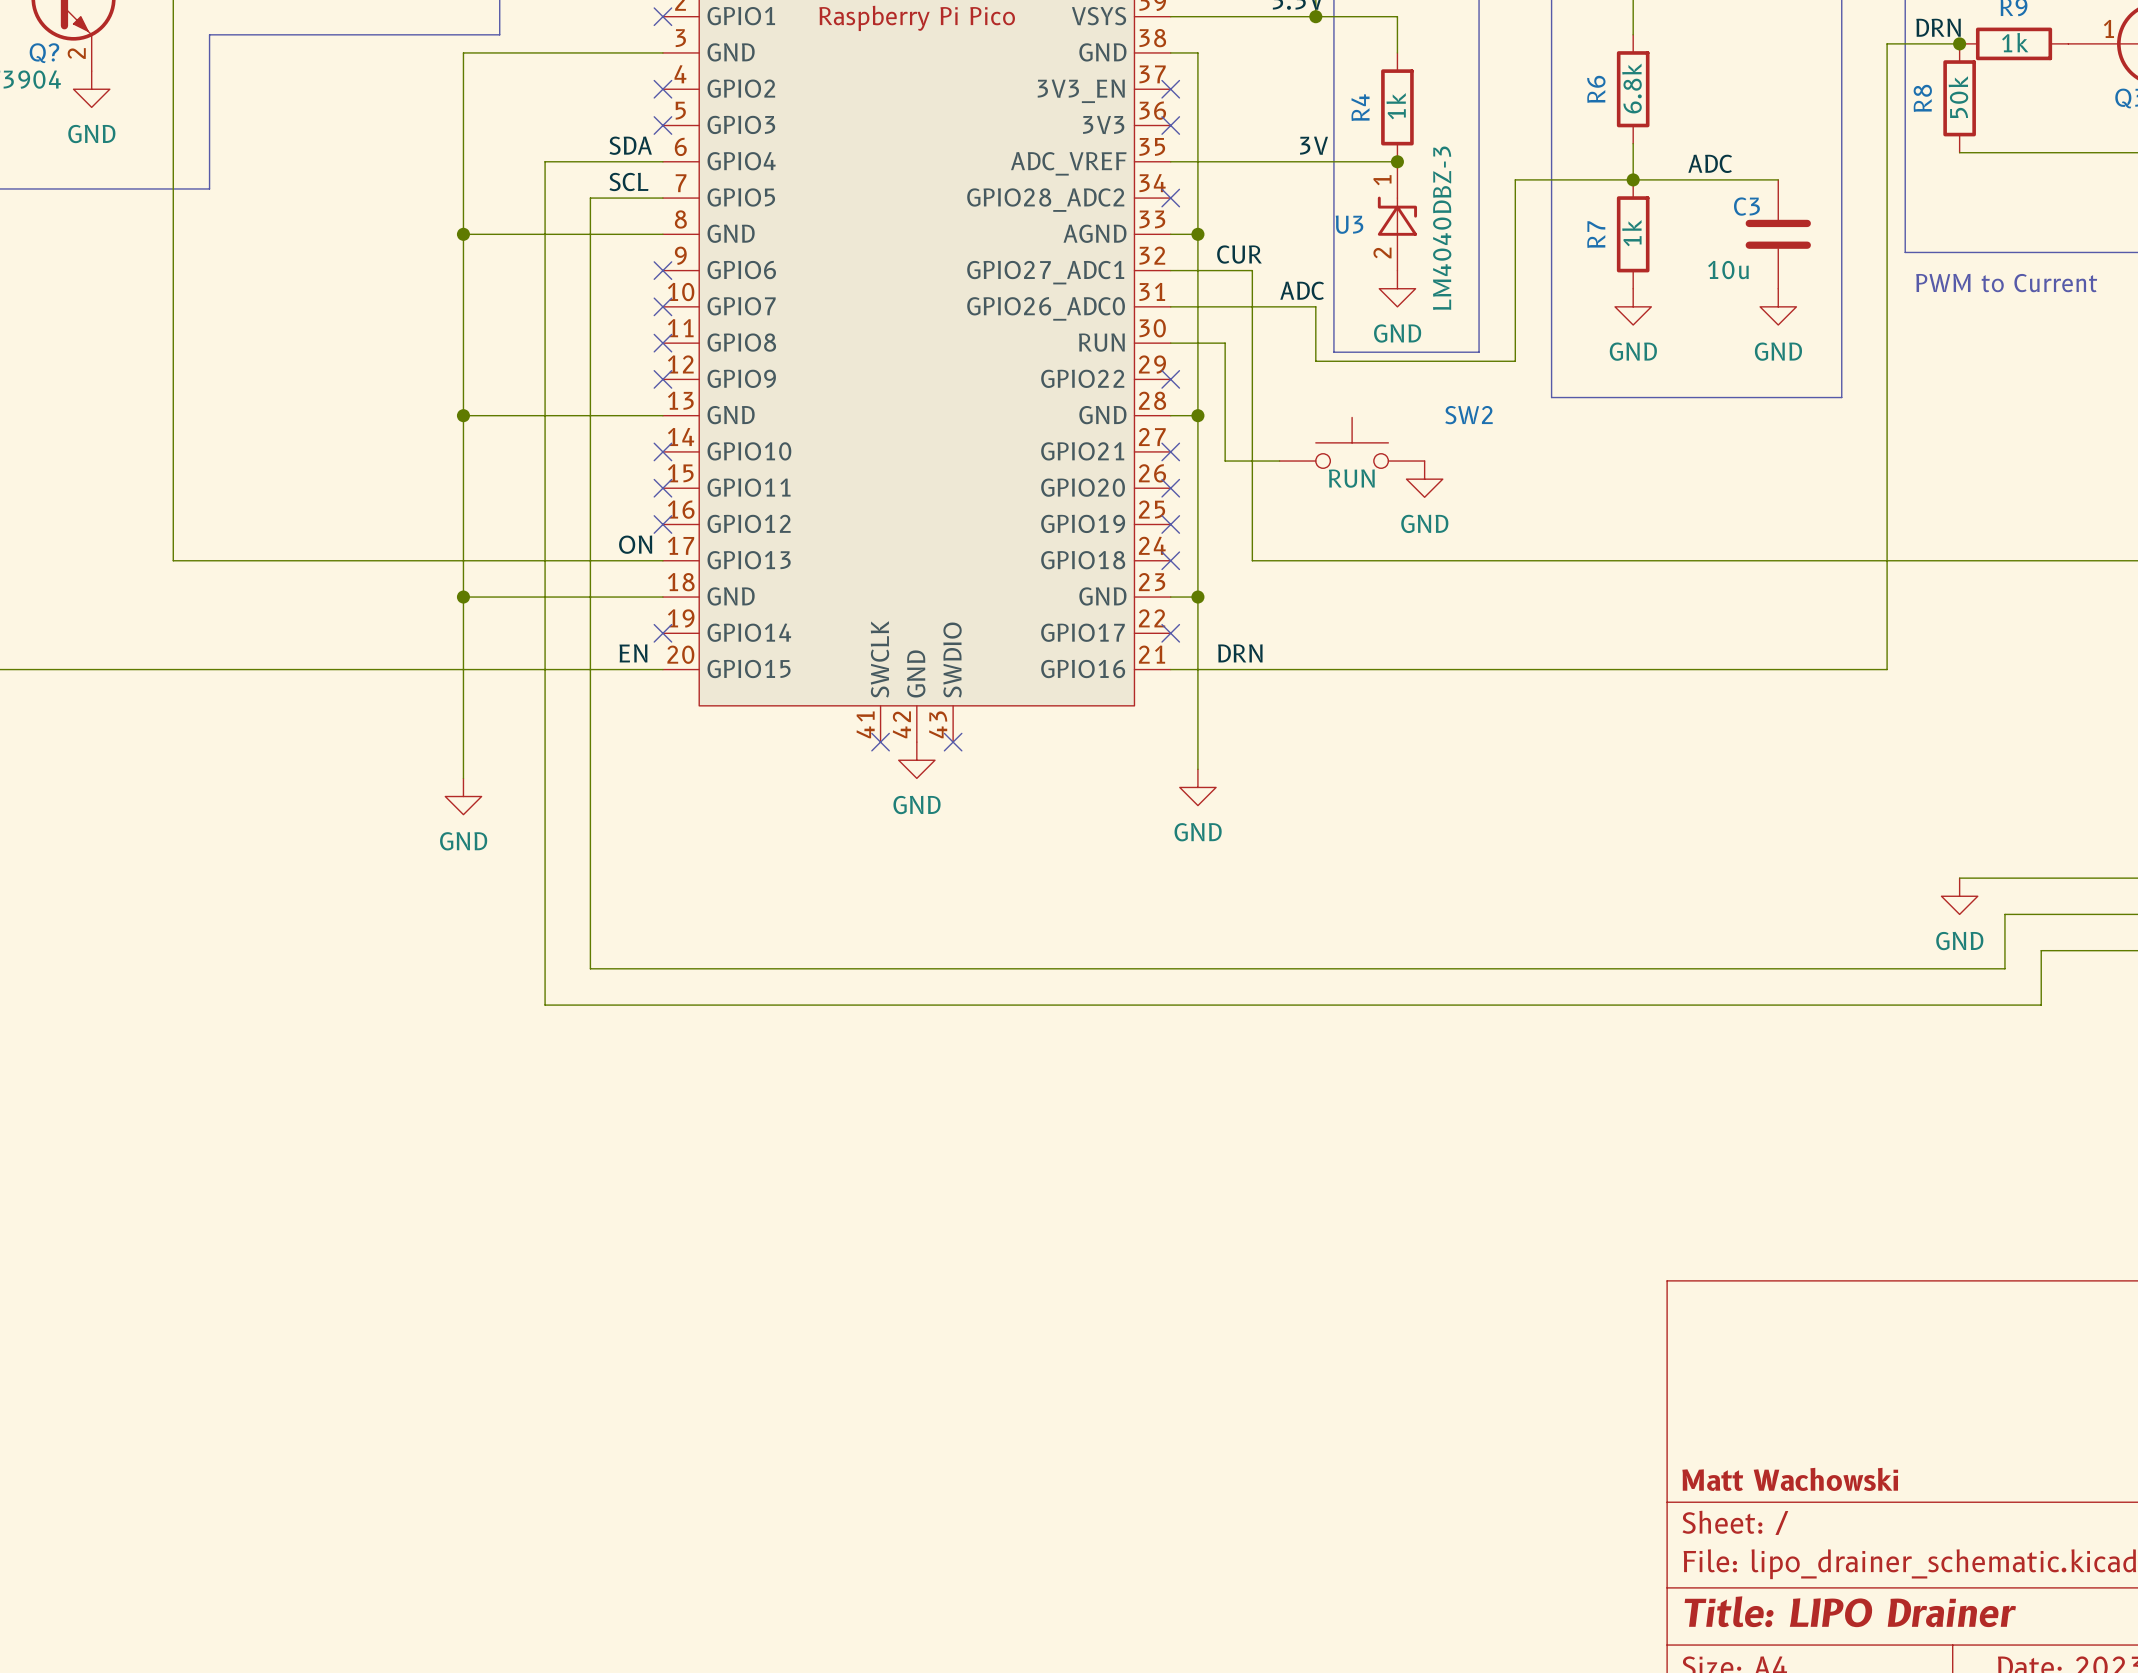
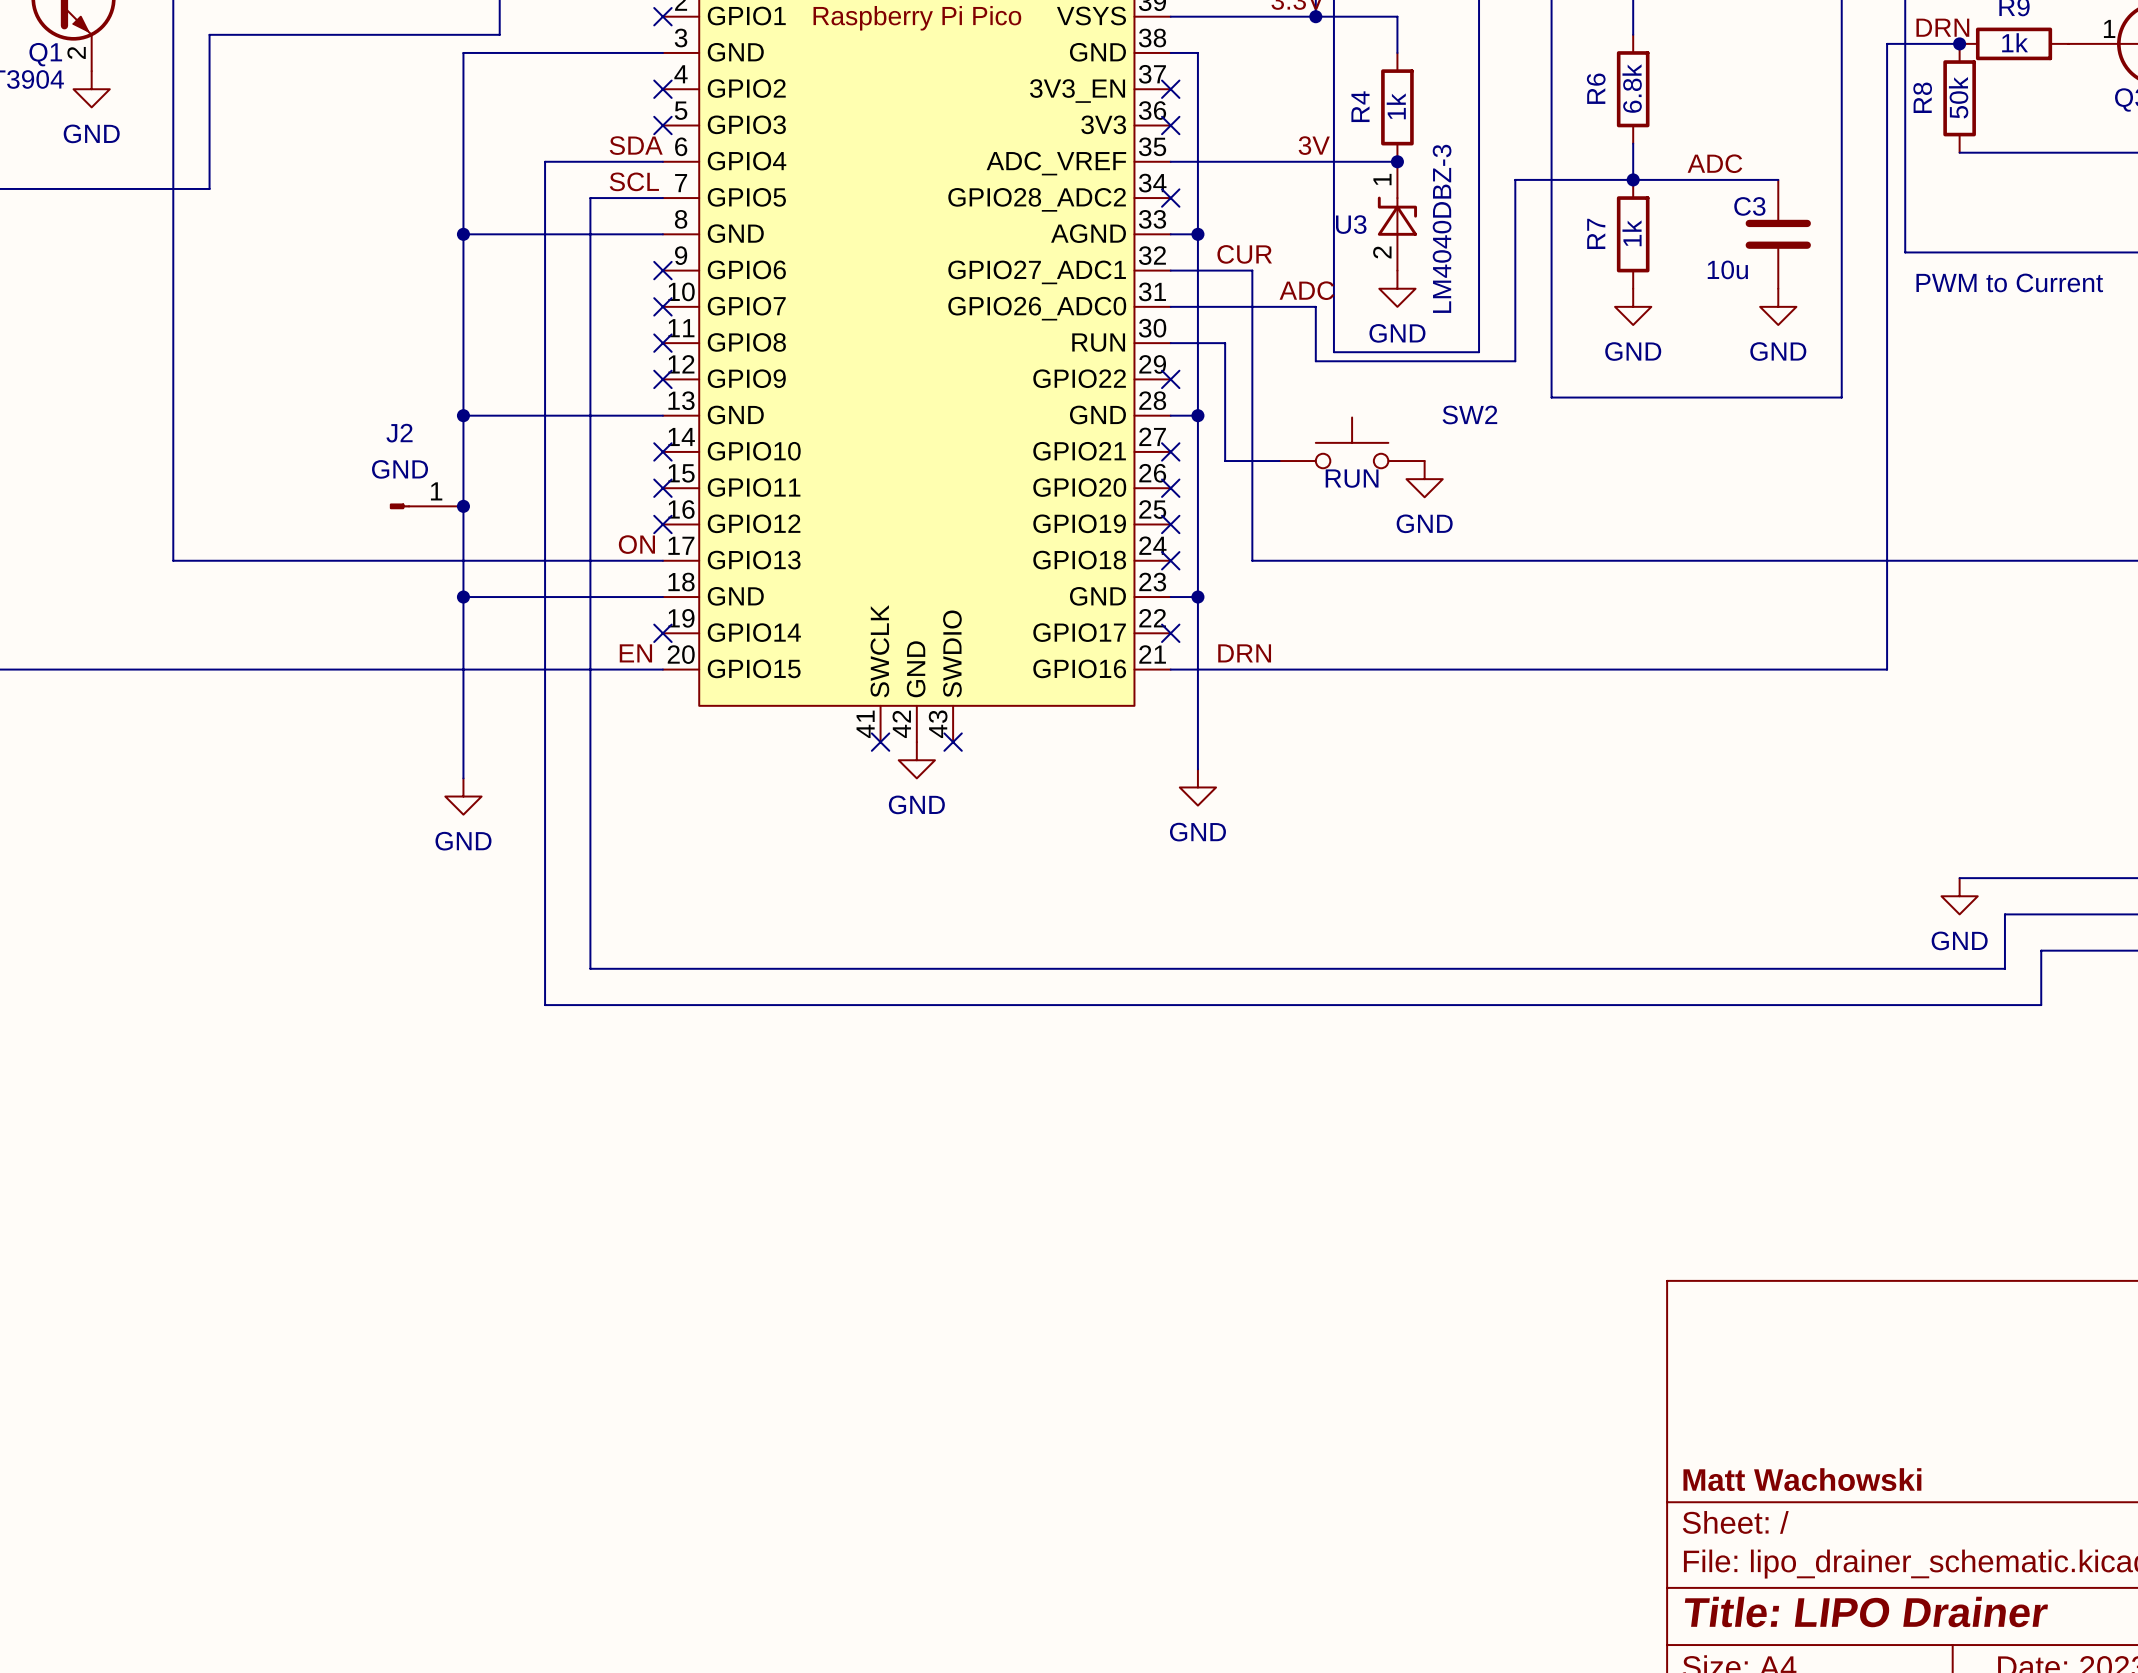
Q? name: Q? (44, 53) -> Q1 (45, 54)
J2: none -> GND (426, 506)
junction: none -> (463, 506)

